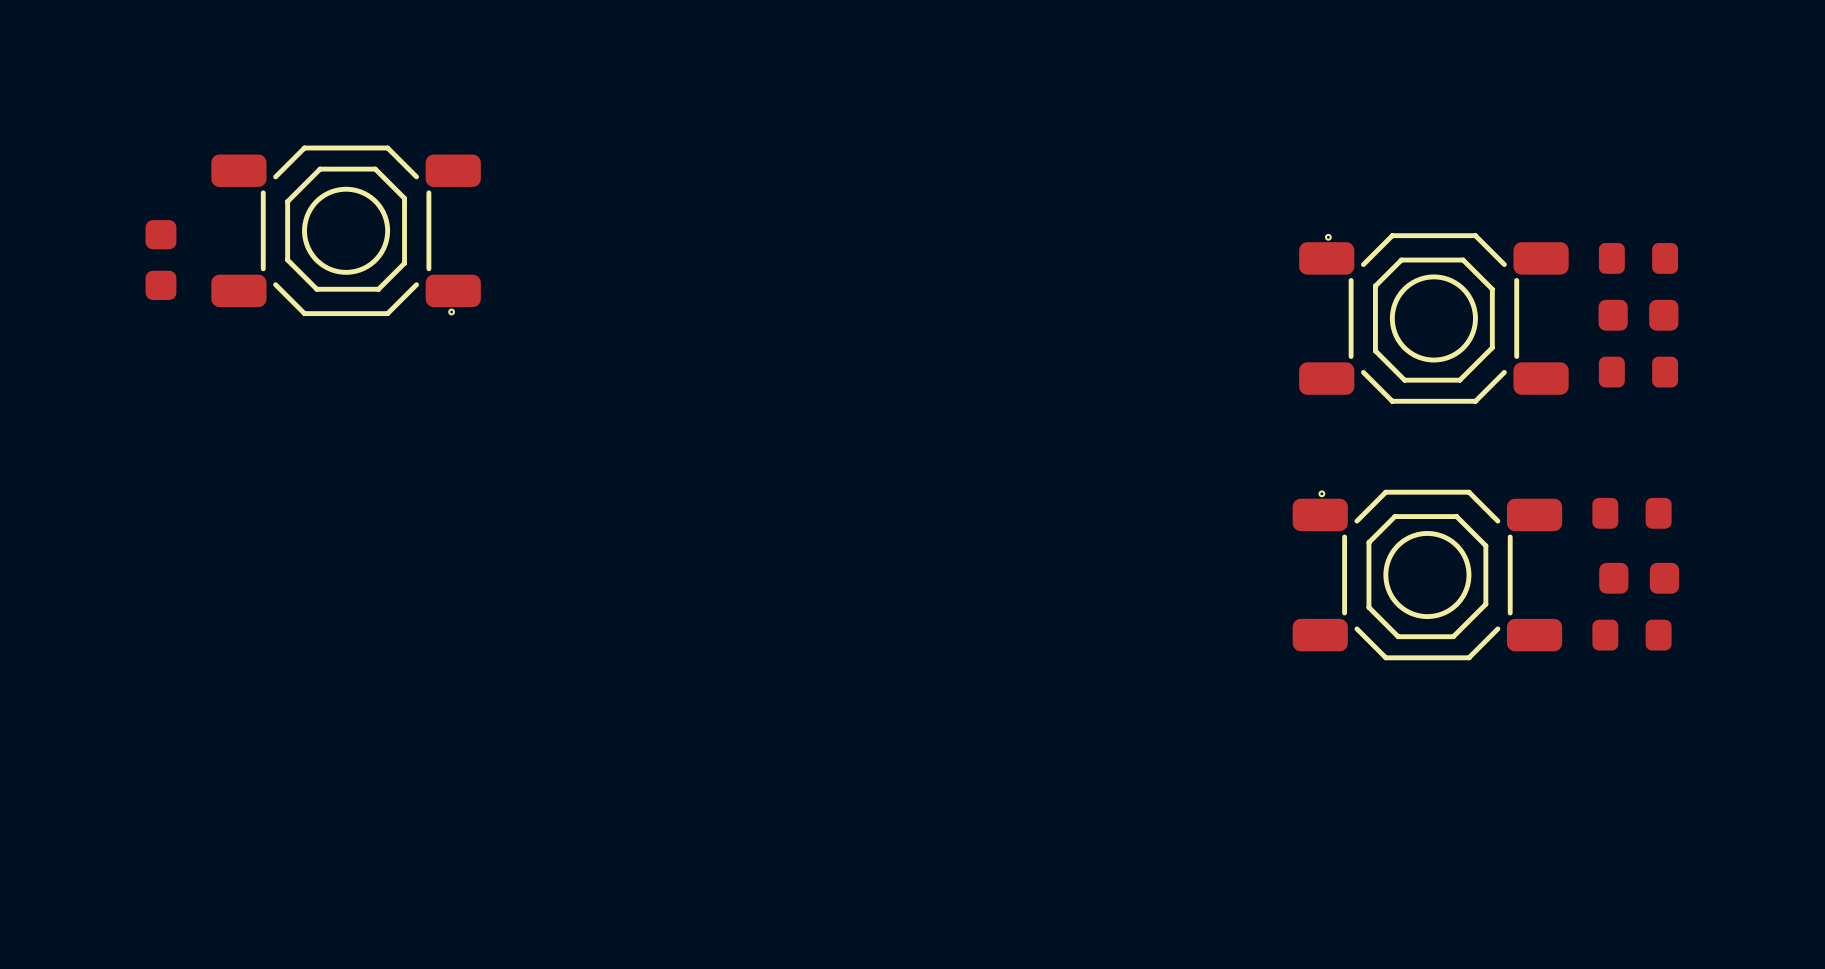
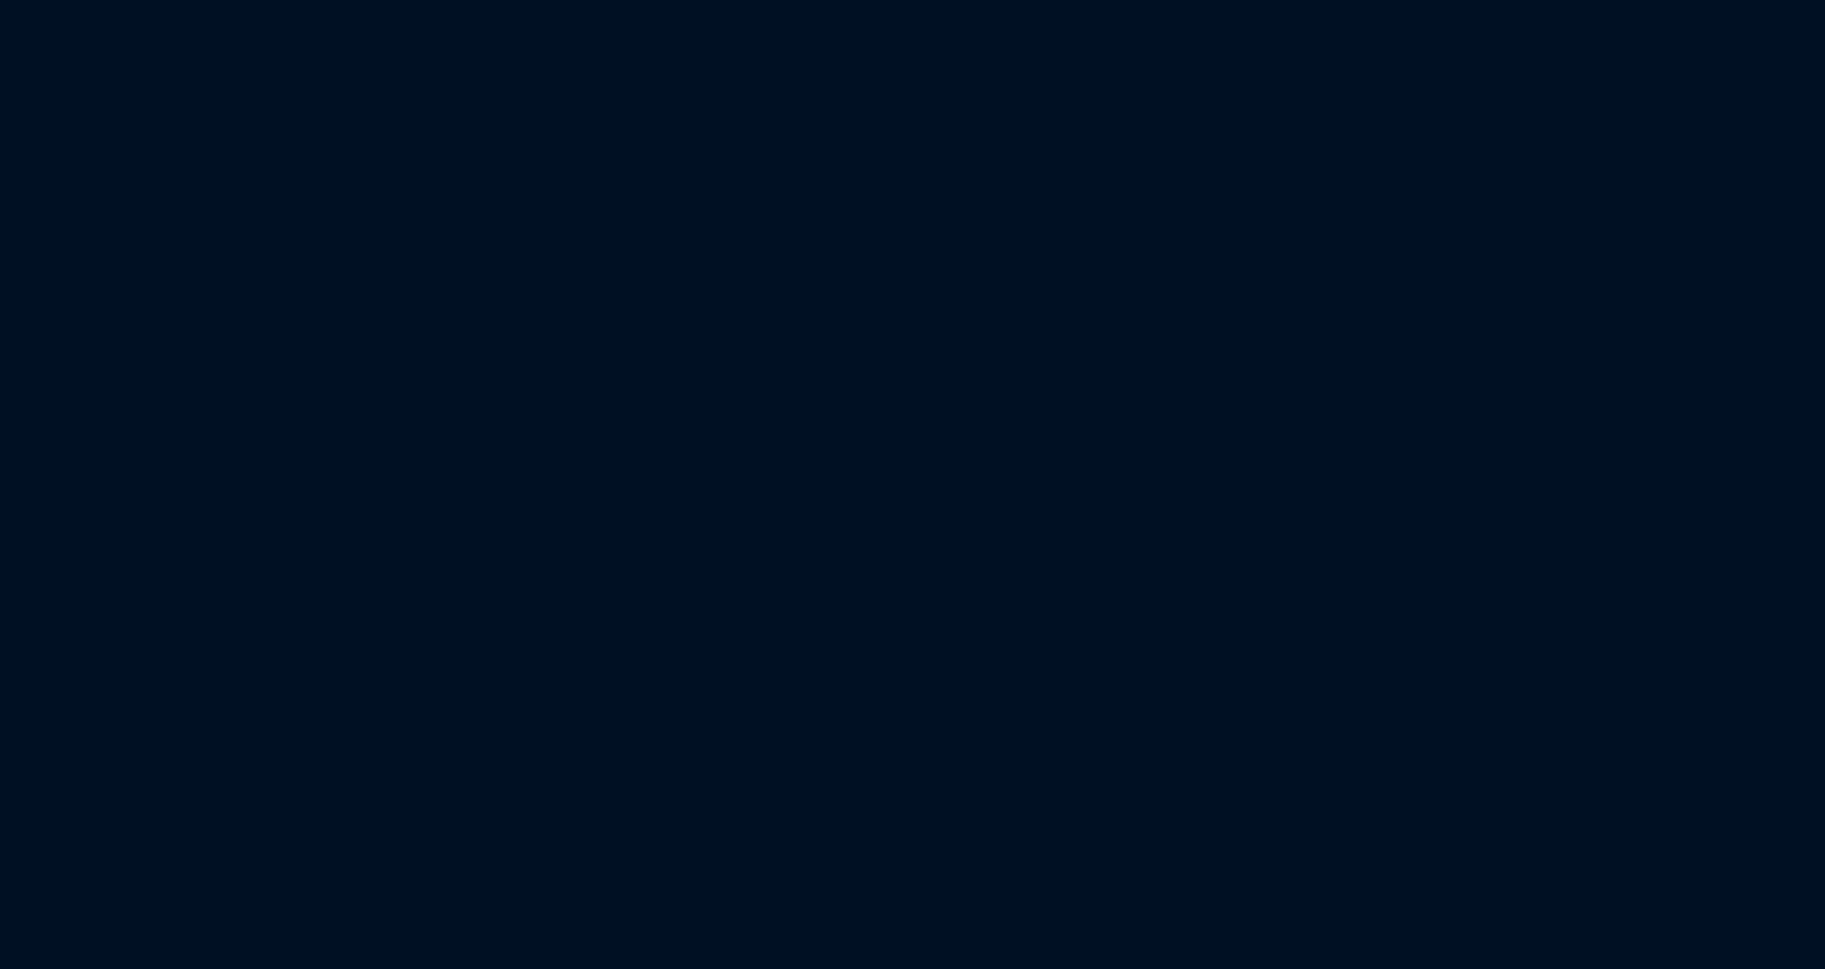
part: (346, 230) -> none
part: (1638, 258) -> none
part: (160, 260) -> none
part: (1638, 315) -> none
part: (1433, 318) -> none
part: (1638, 372) -> none
part: (1631, 513) -> none
part: (1427, 575) -> none
part: (1639, 578) -> none
part: (1631, 635) -> none

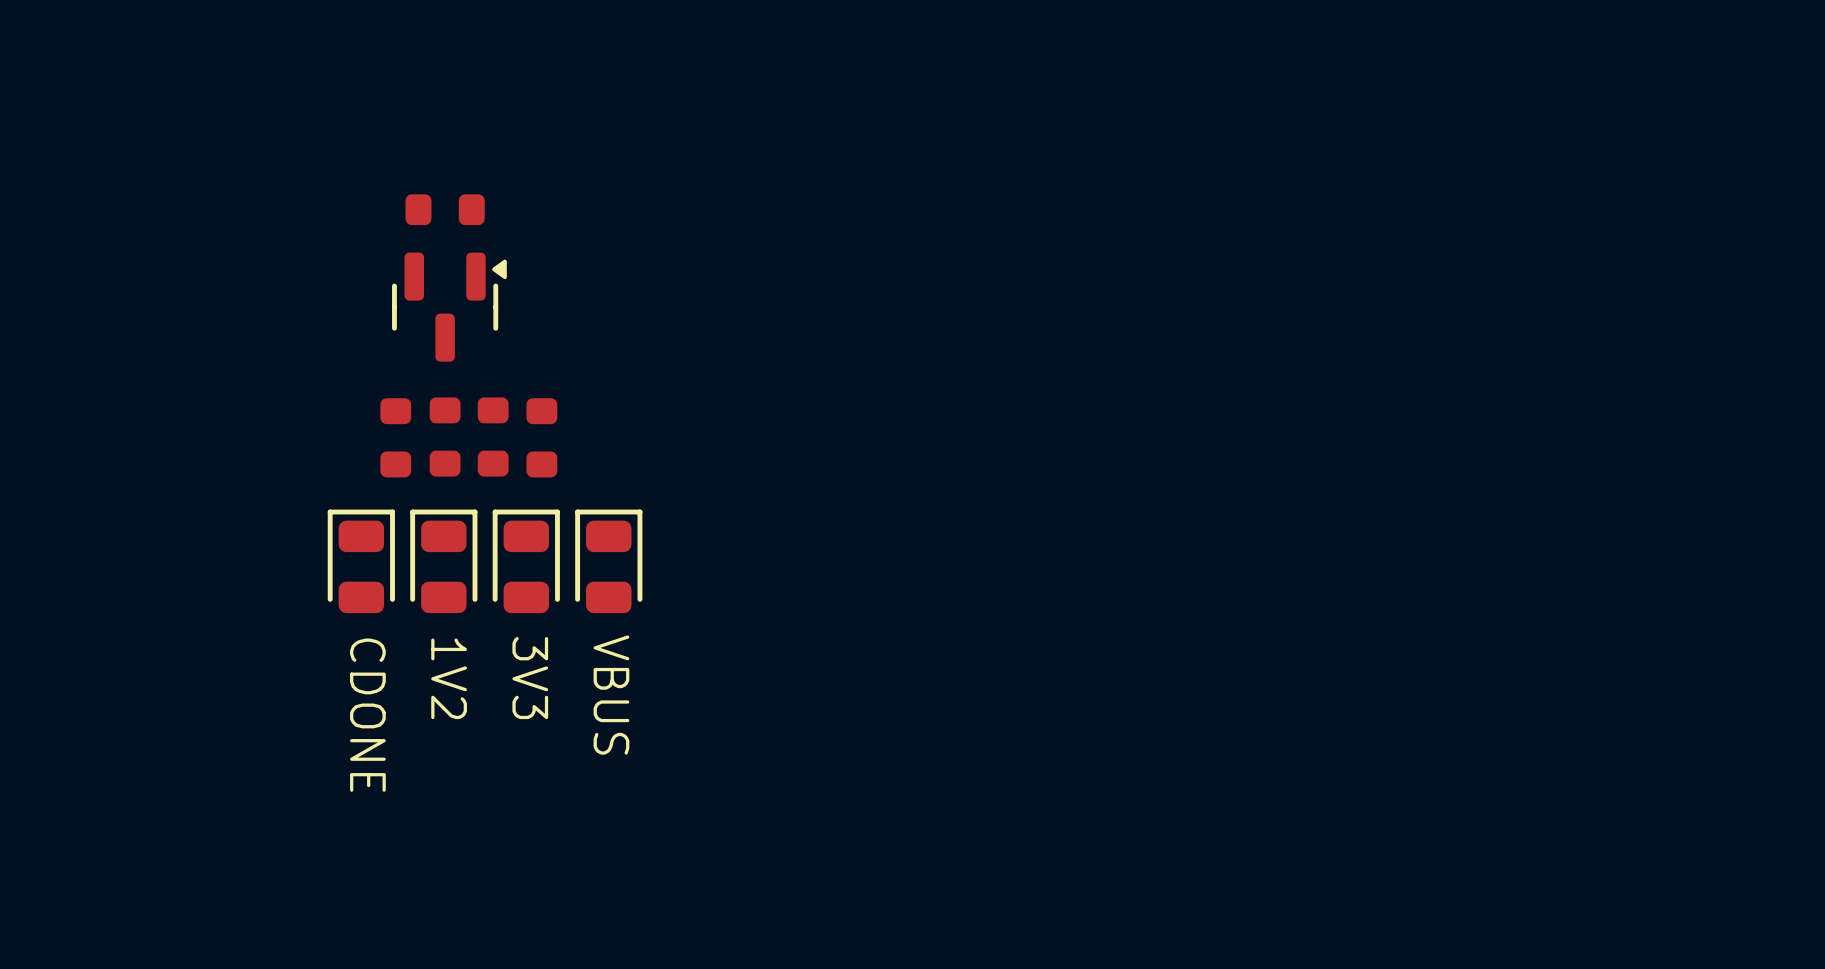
part: none -> (445, 209)
part: none -> (449, 307)
part: none -> (395, 437)
part: none -> (445, 437)
part: none -> (493, 437)
part: none -> (541, 437)
part: none -> (361, 561)
part: none -> (443, 561)
part: none -> (526, 561)
part: none -> (608, 561)
text: none -> 1V2 (449, 678)
text: none -> 3V3 (530, 678)
text: none -> VBUS (611, 695)
text: none -> CDONE (367, 715)

